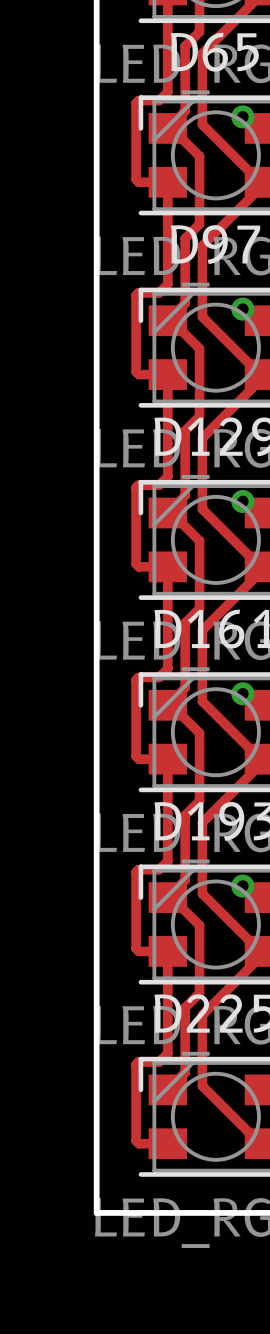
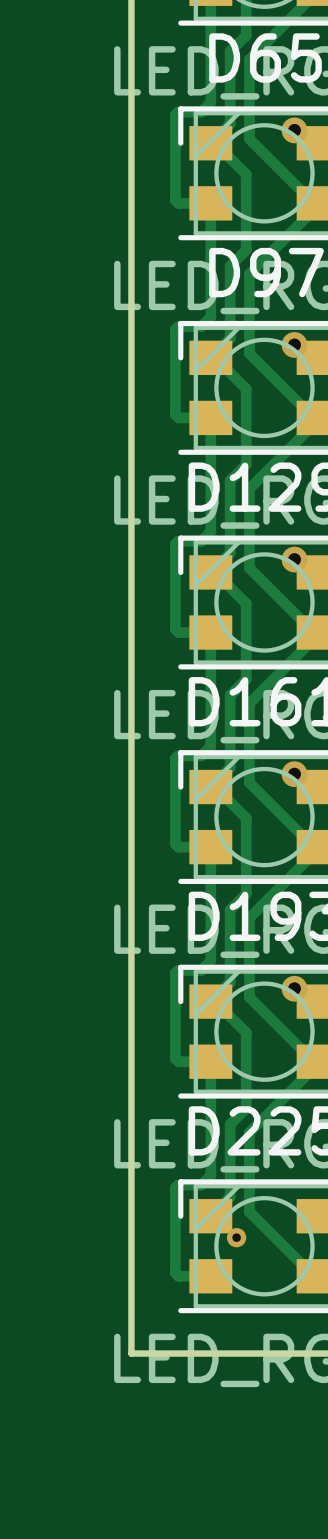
via: none -> (236, 1237)

